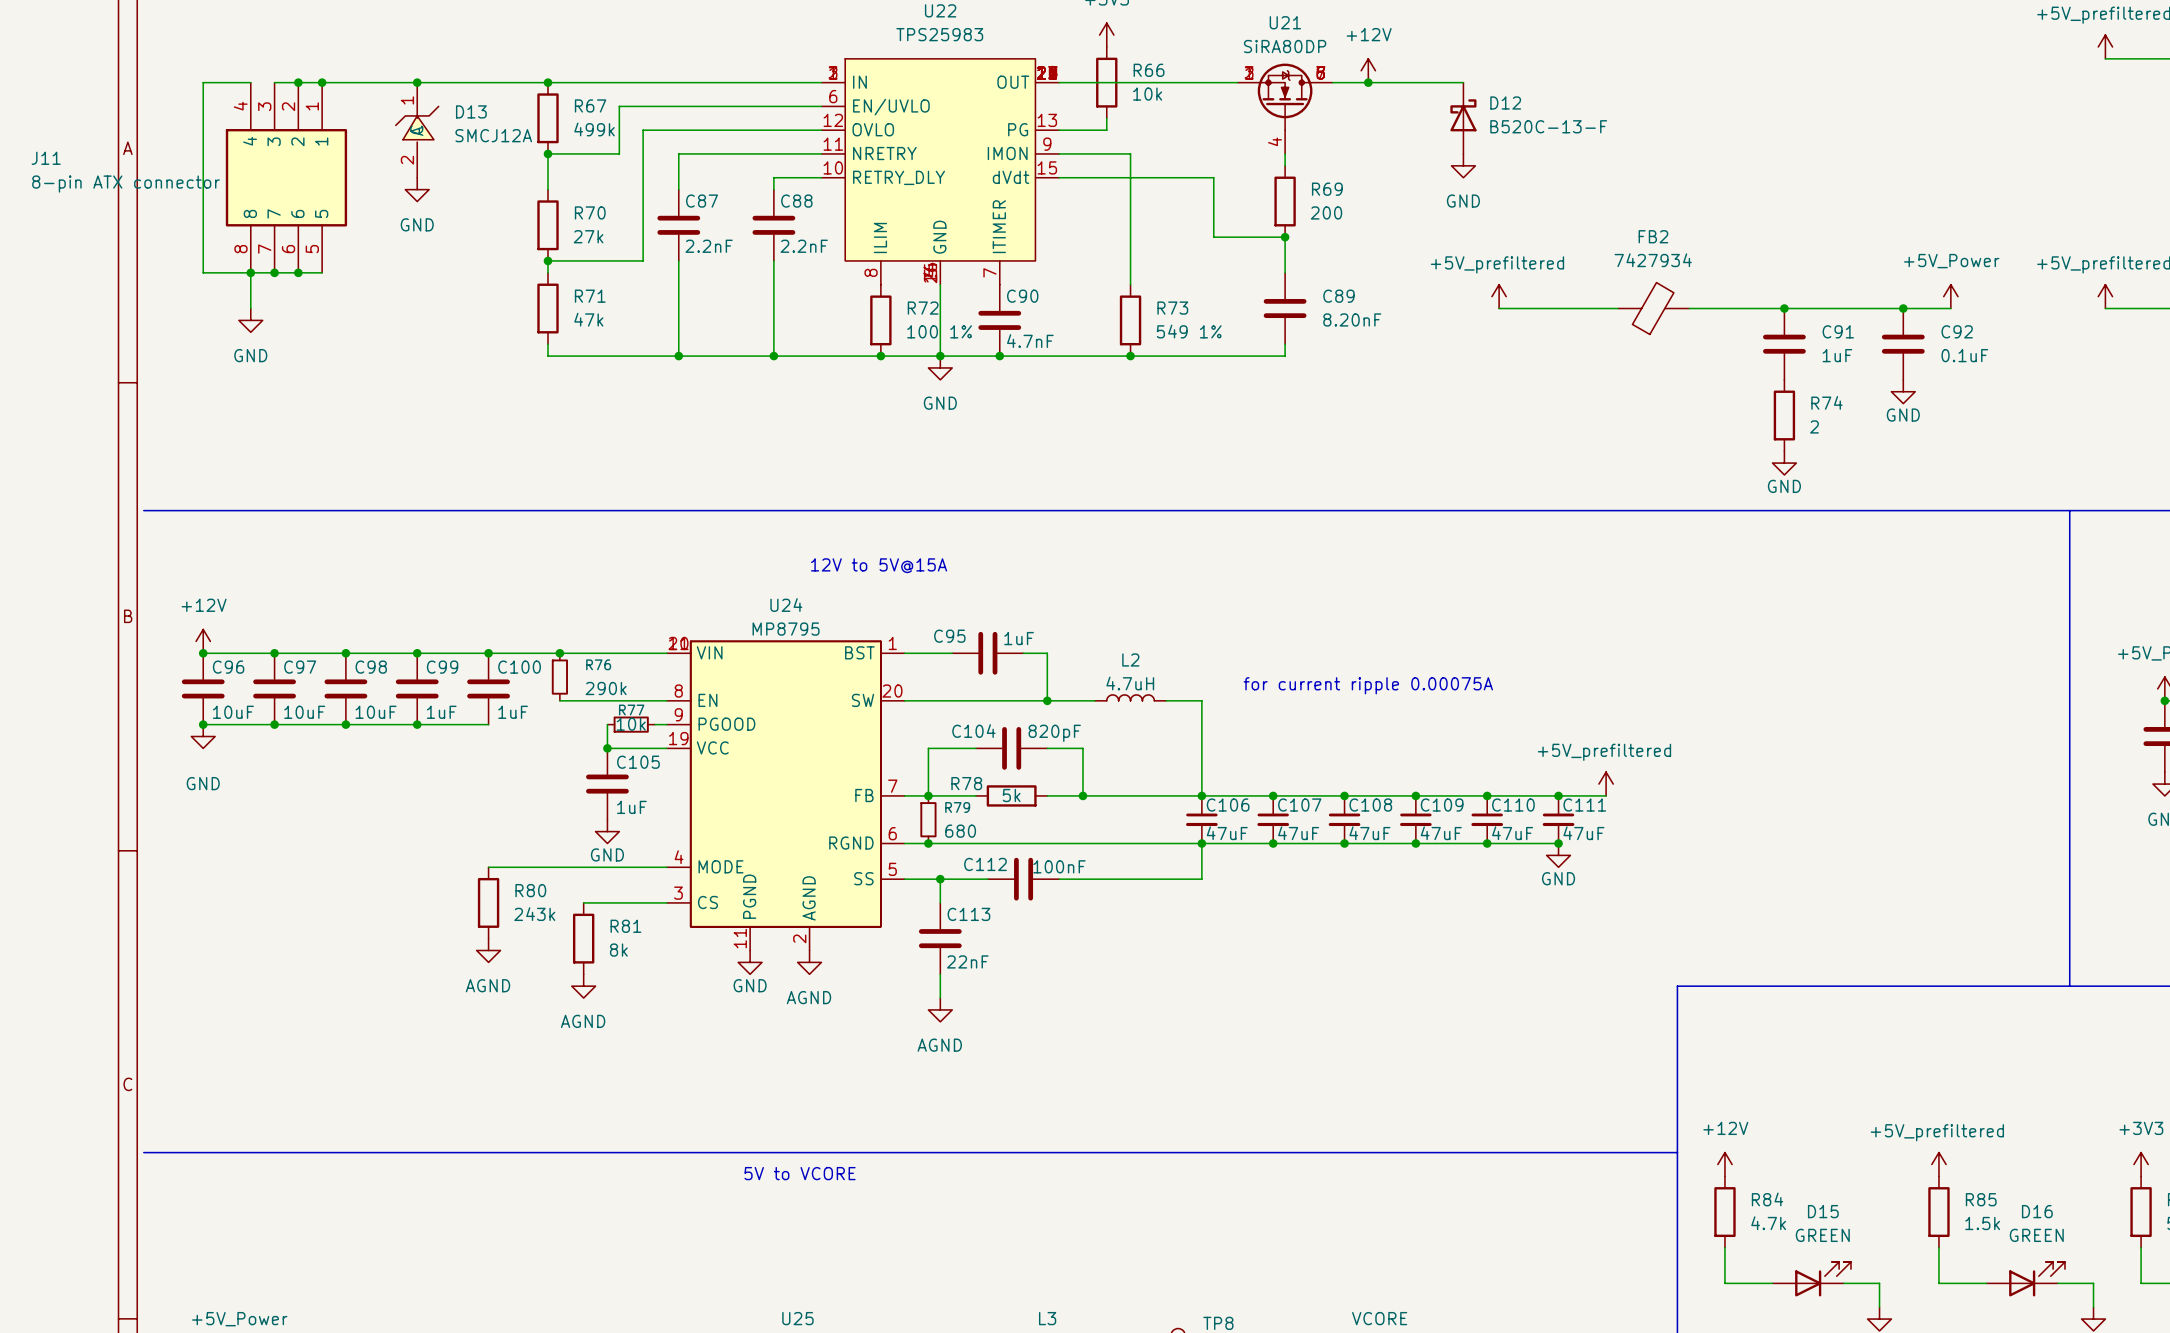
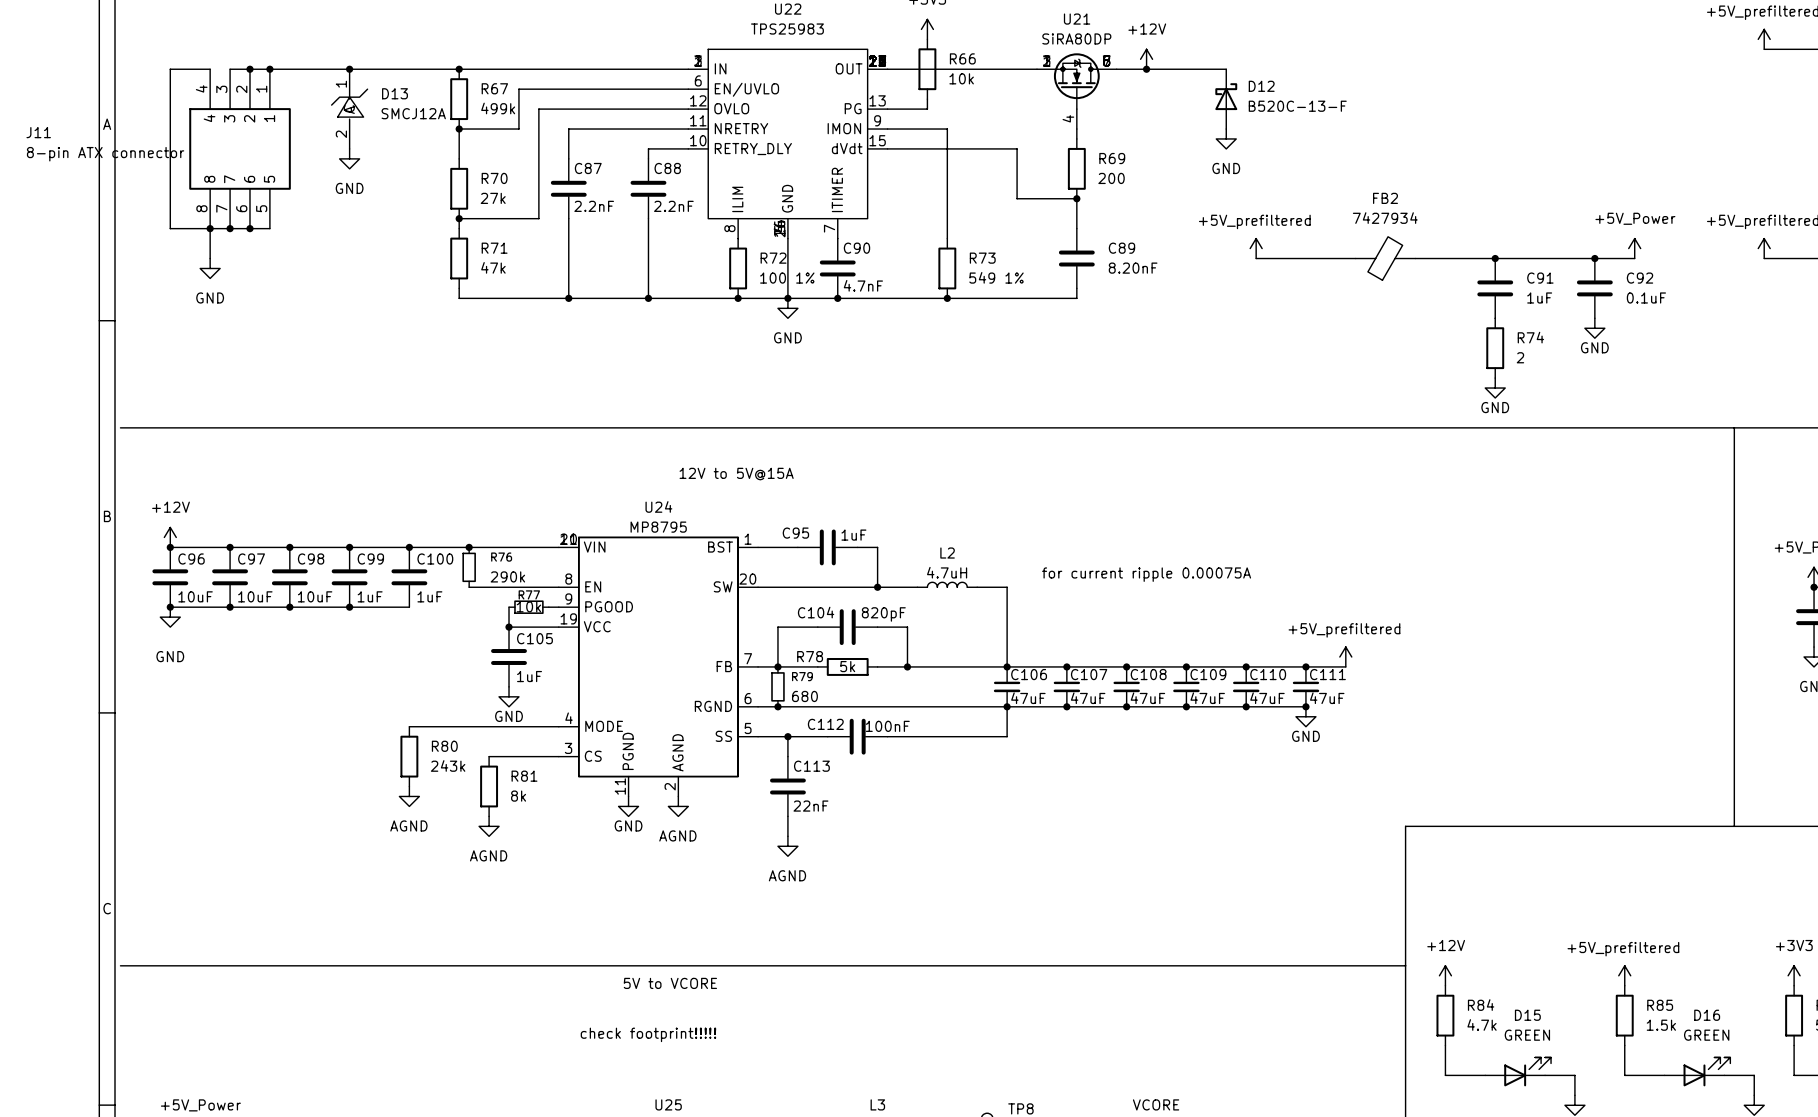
text: none -> check footprint!!!!! (648, 1034)

